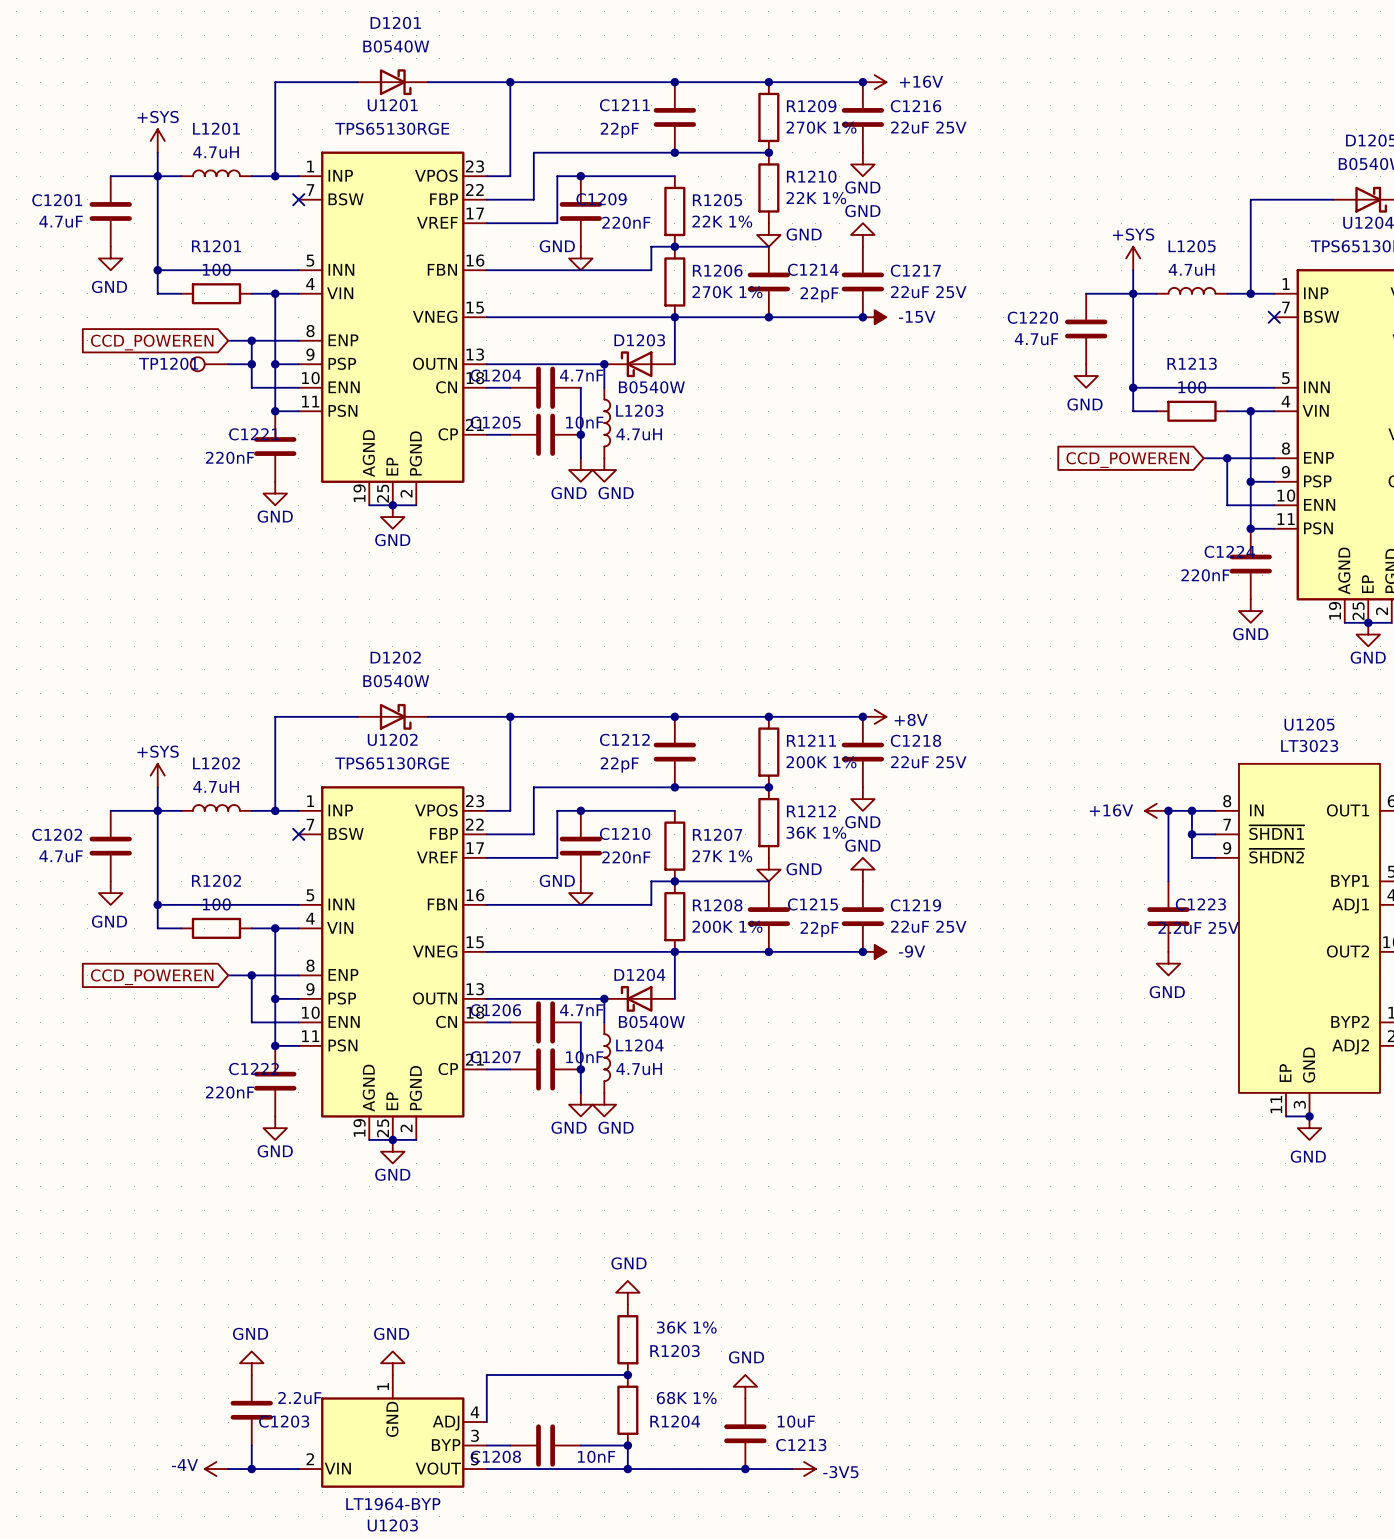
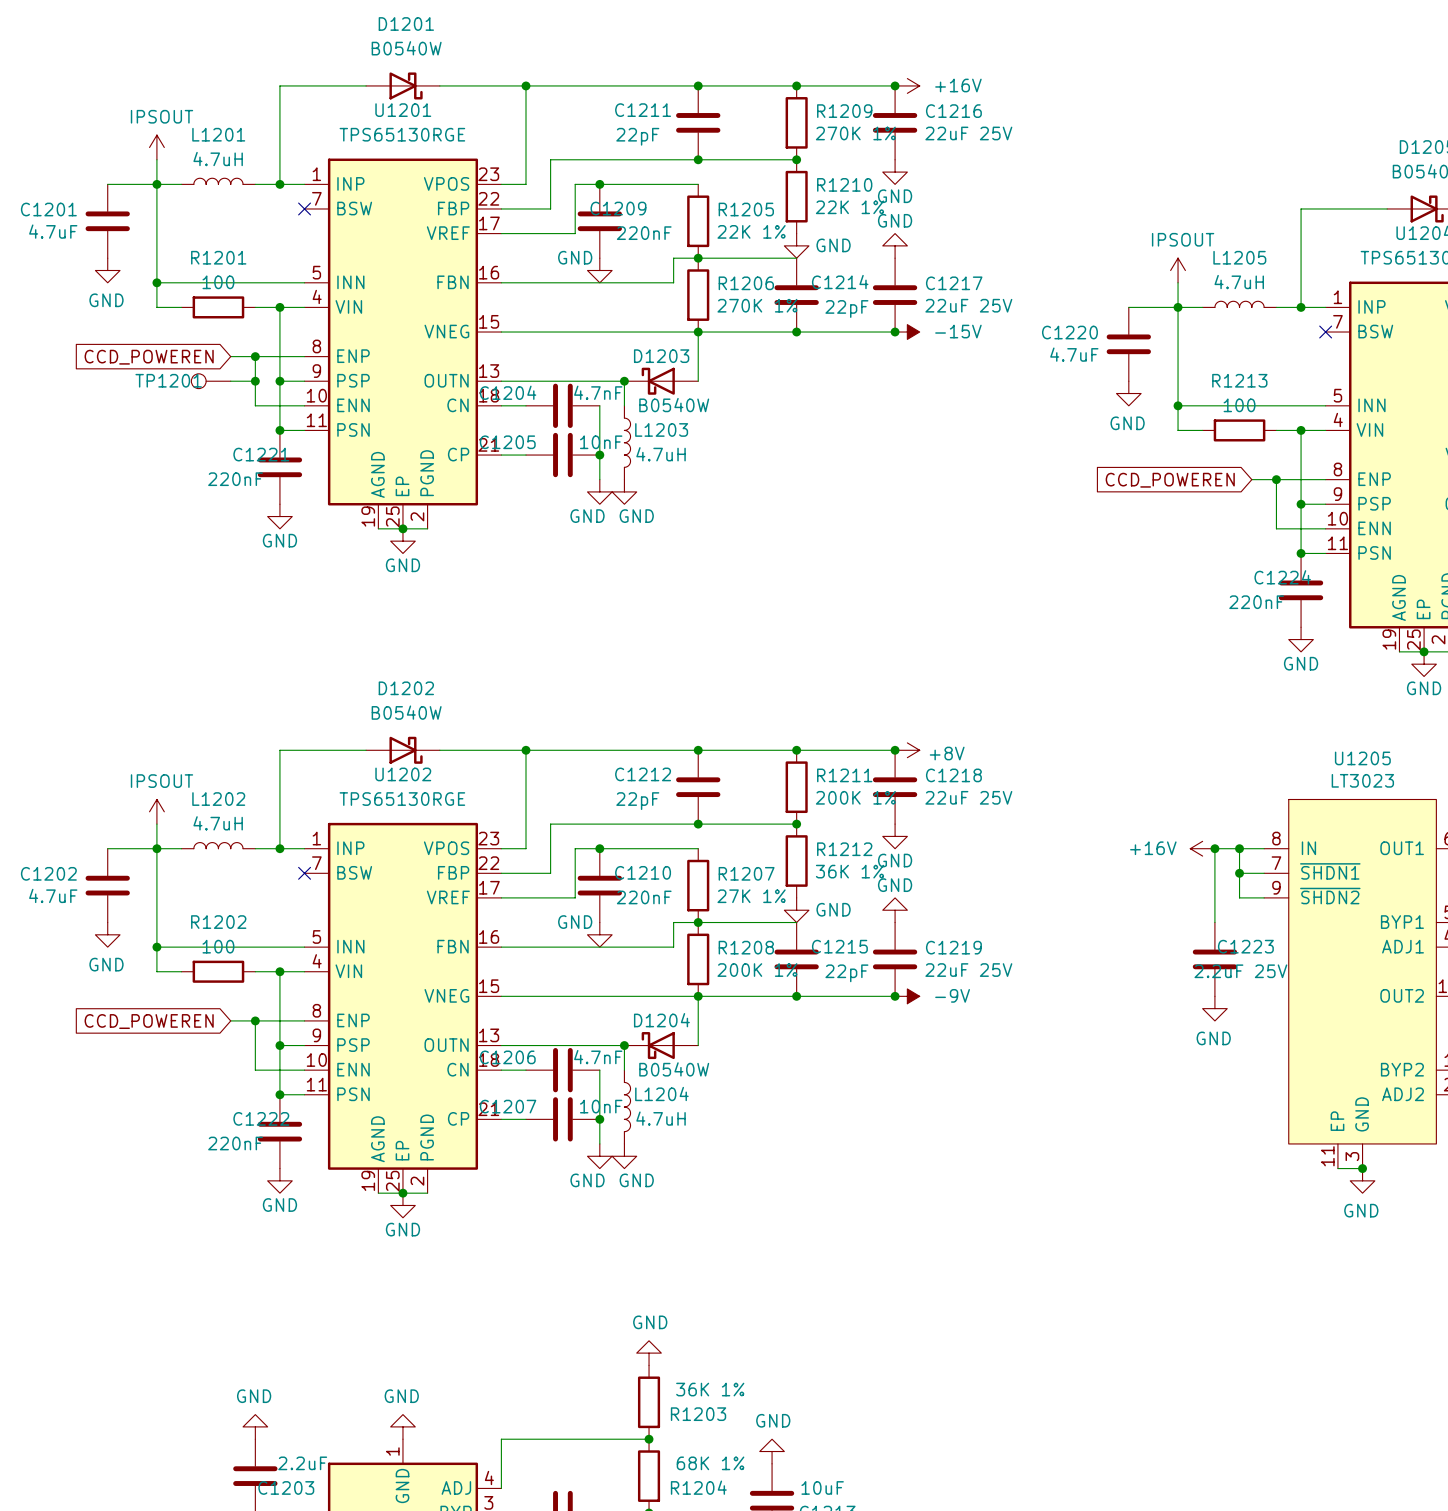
power symbol: +SYS (157, 140) -> IPSOUT (156, 147)
power symbol: +SYS (1133, 258) -> IPSOUT (1178, 270)
power symbol: +SYS (157, 775) -> IPSOUT (156, 811)

